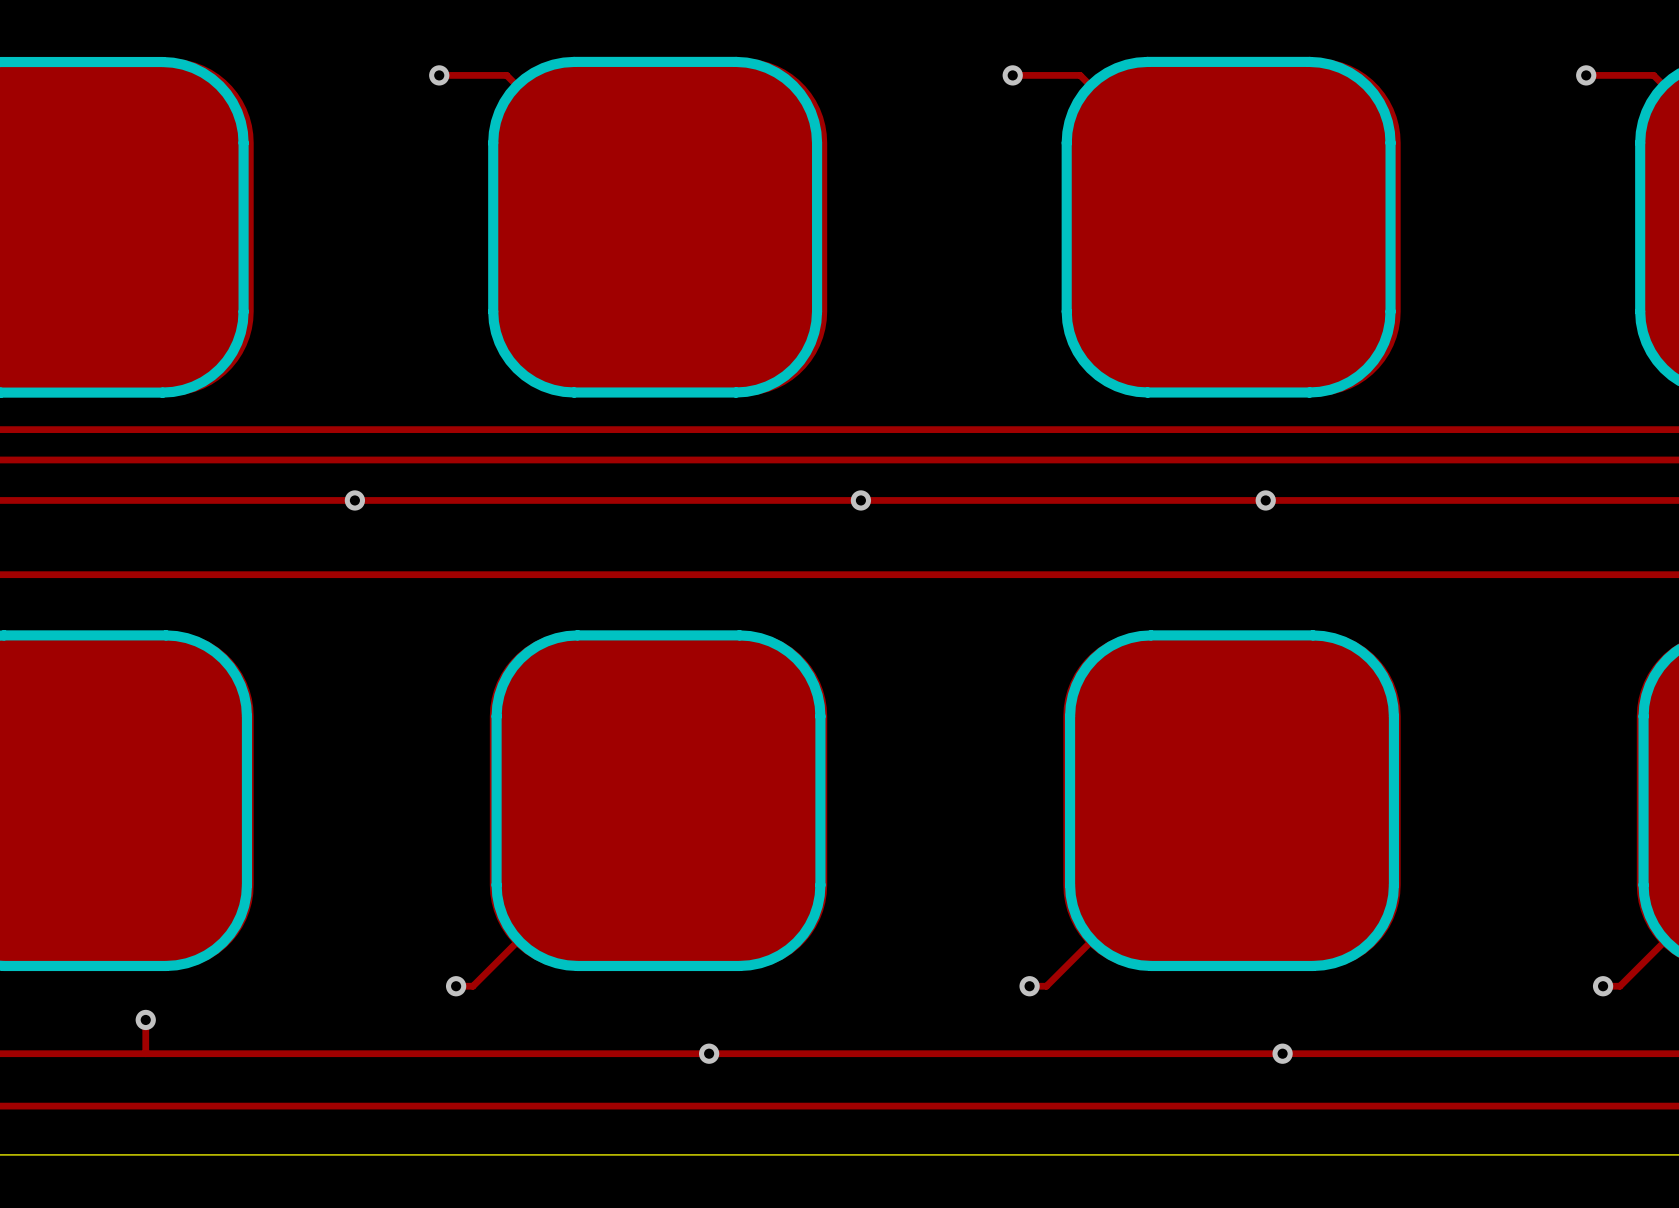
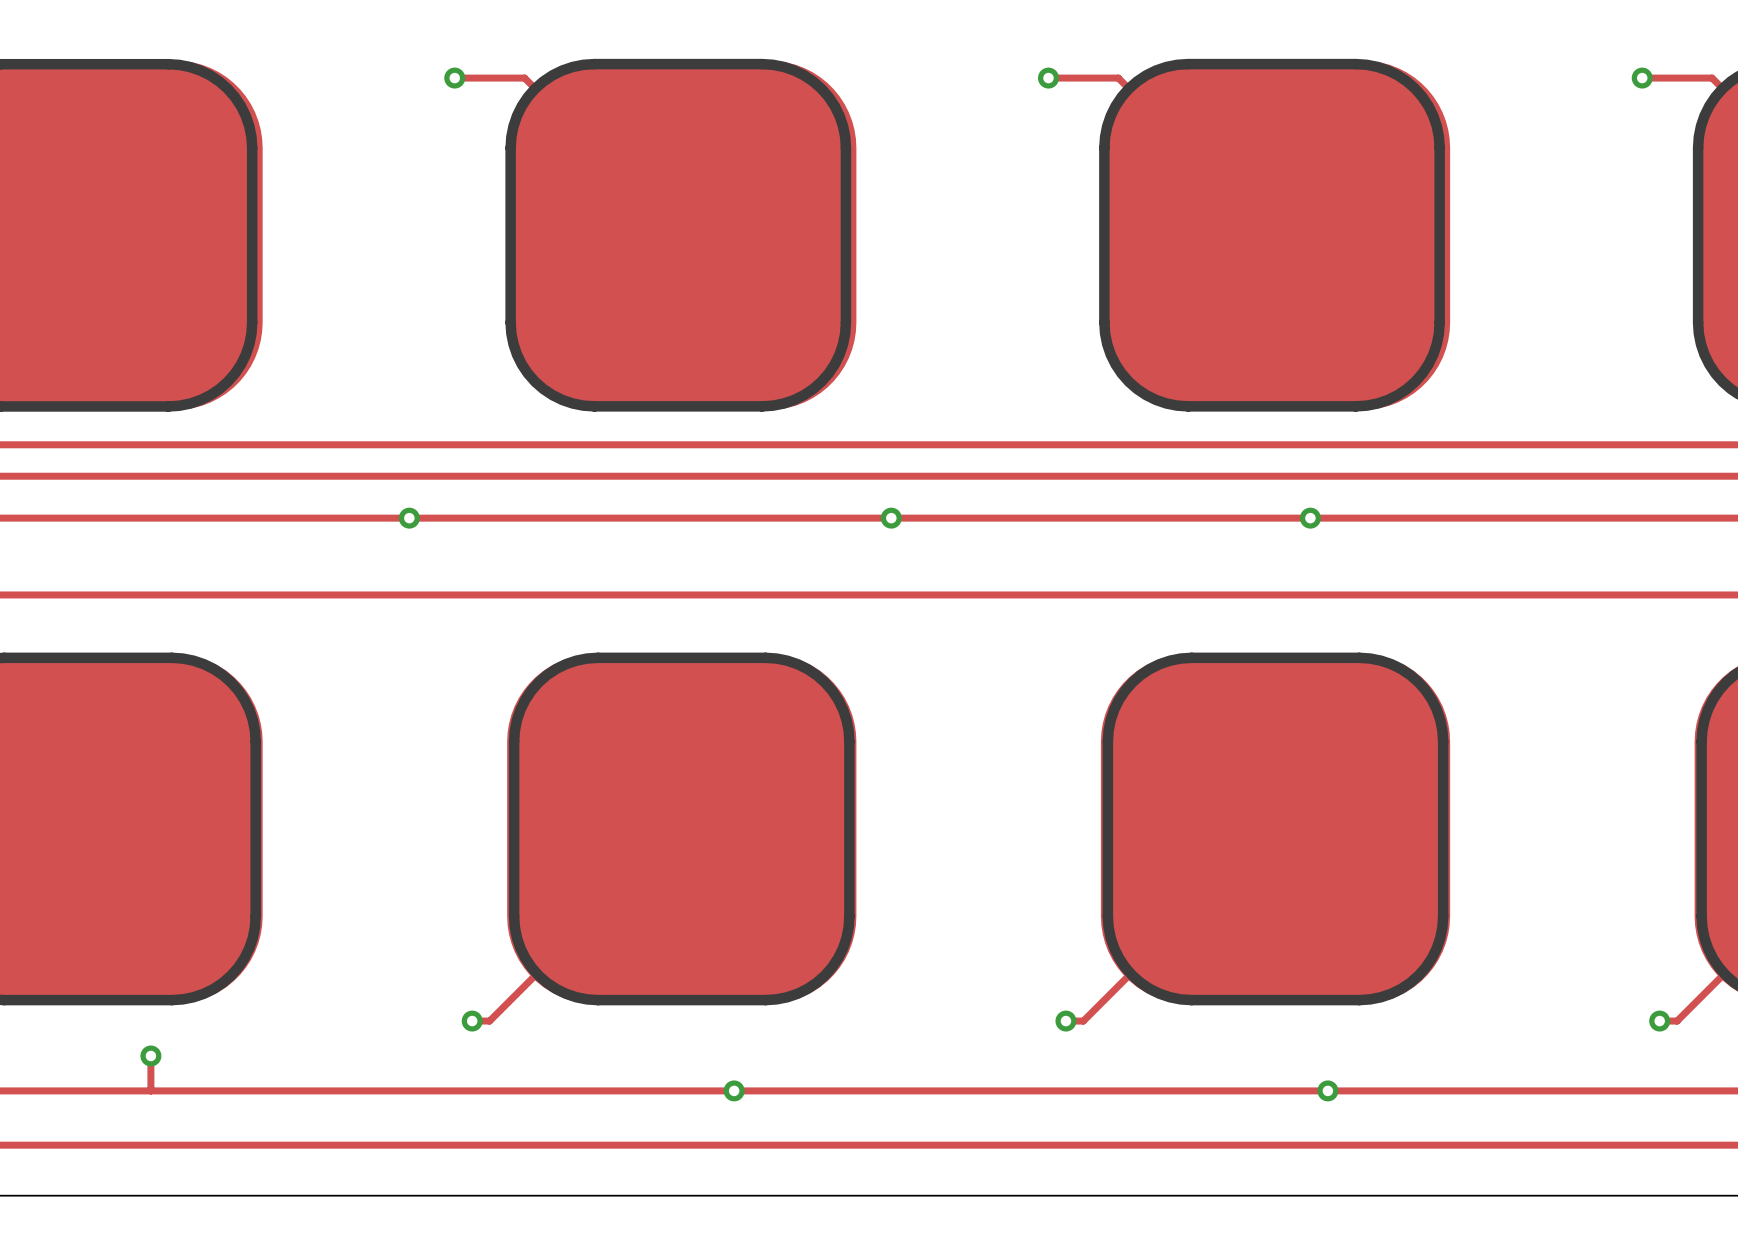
via position: (354, 500) -> (409, 518)

